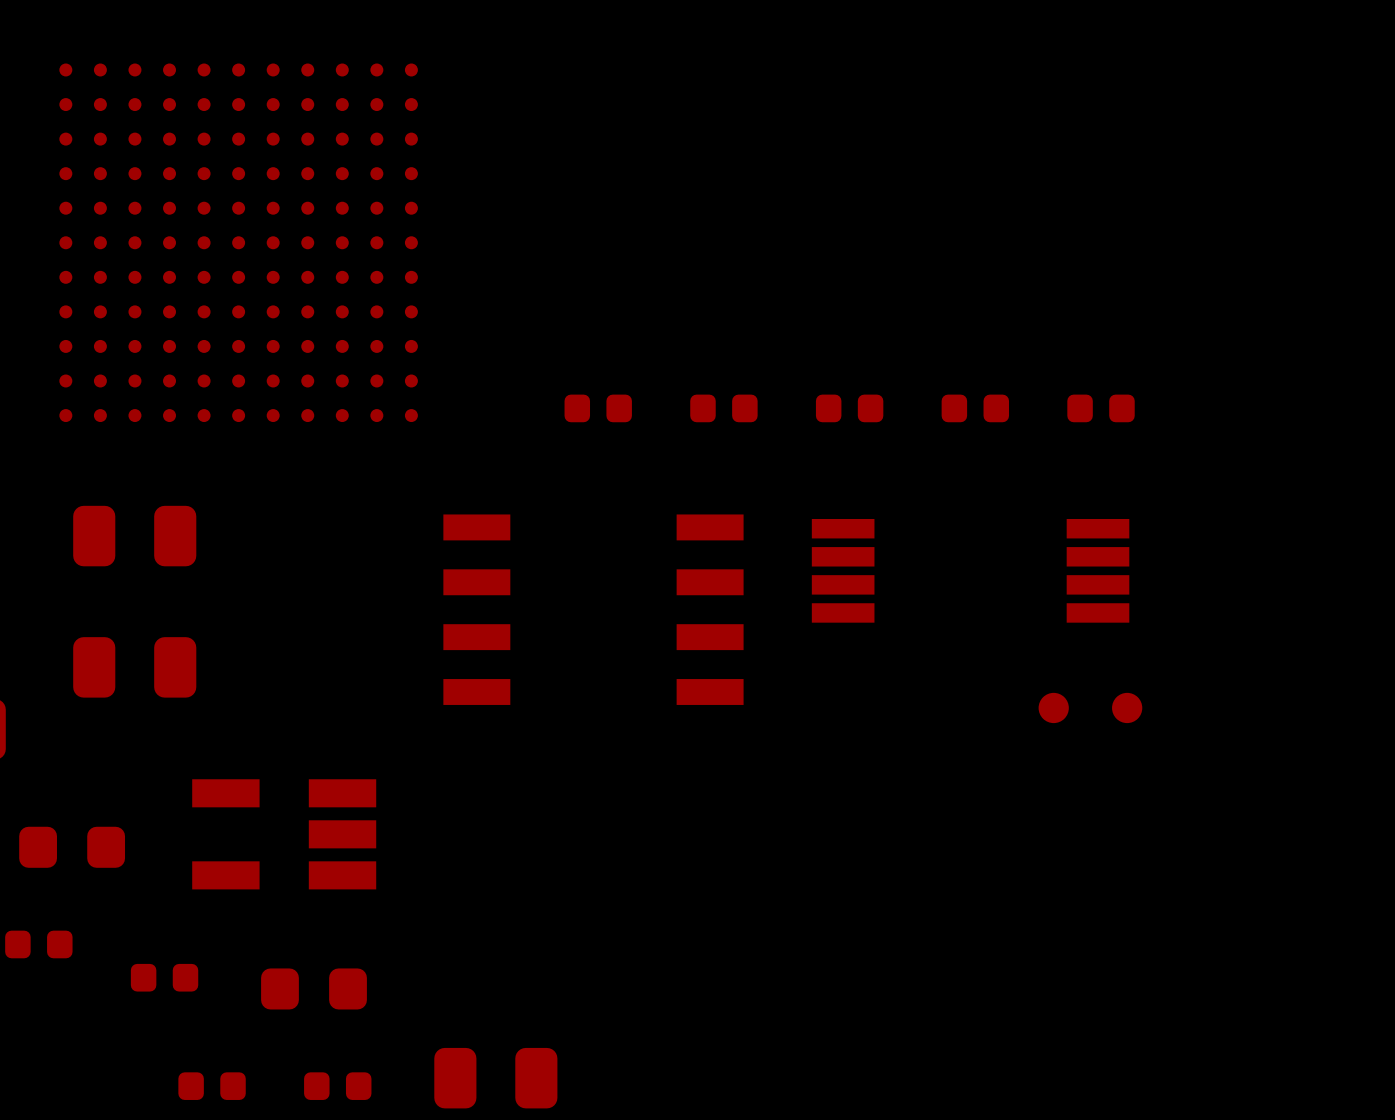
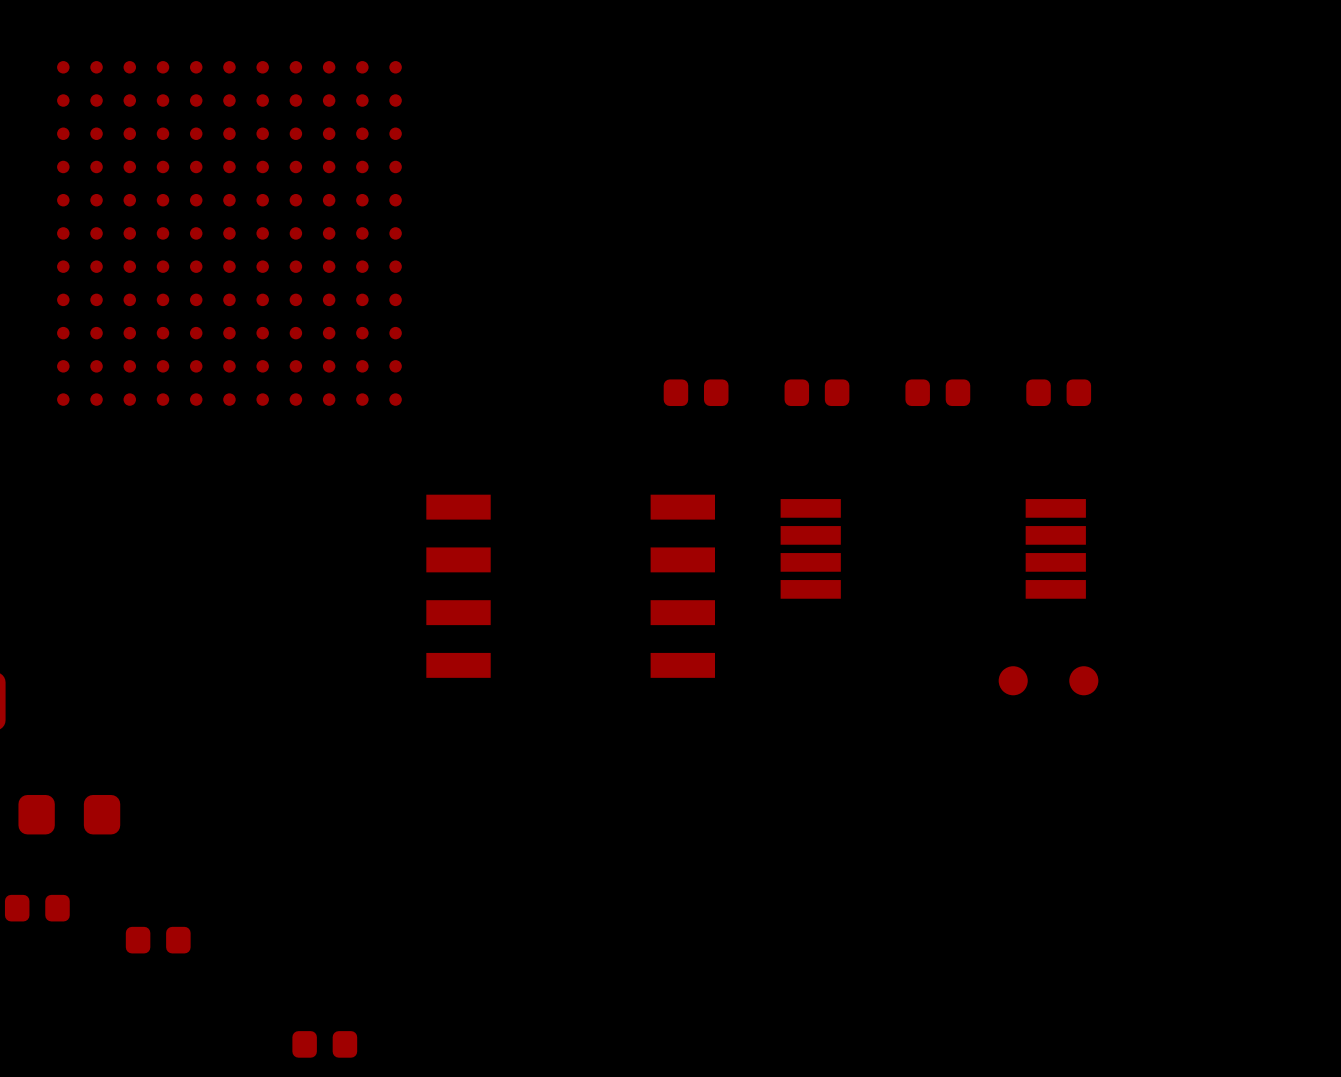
part: (598, 408) -> none
part: (134, 536) -> none
part: (134, 667) -> none
part: (284, 834) -> none
part: (314, 988) -> none
part: (495, 1078) -> none
part: (212, 1086) -> none

